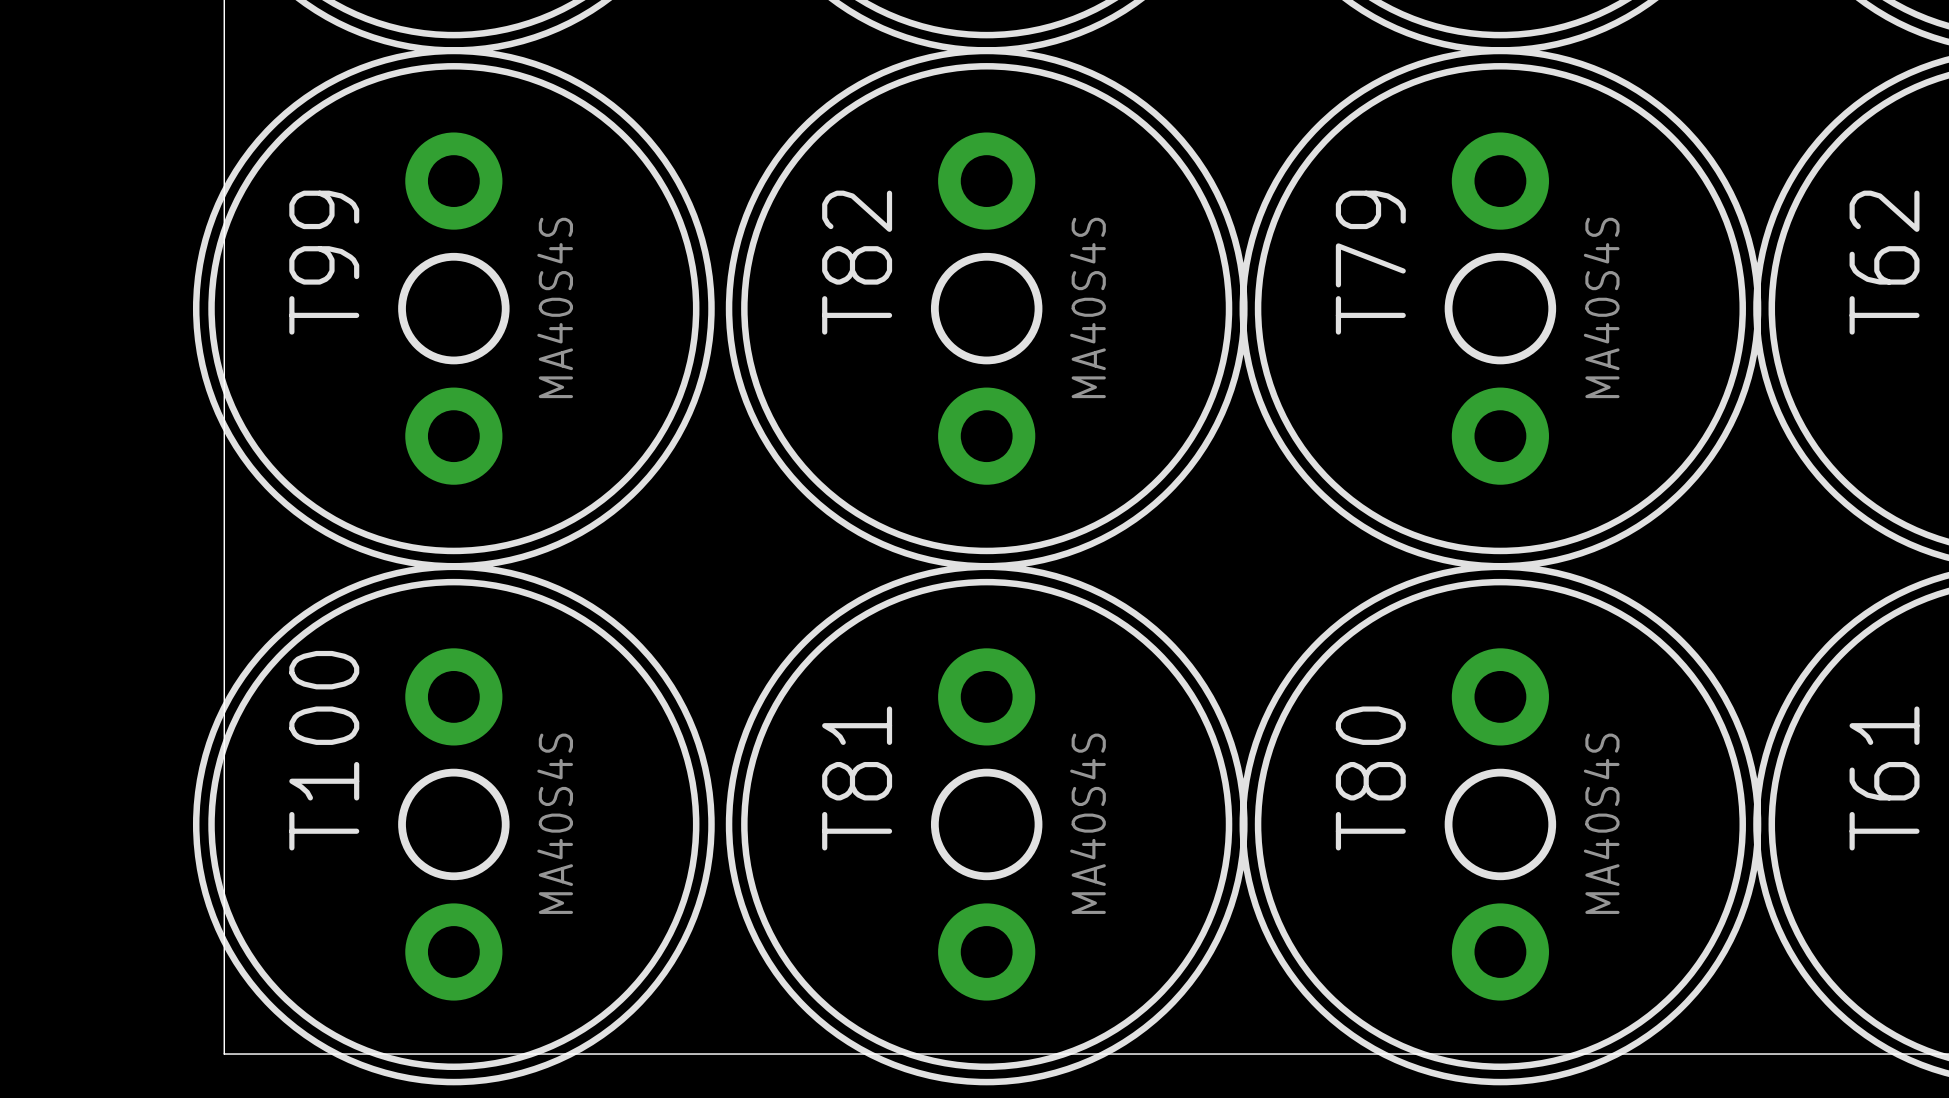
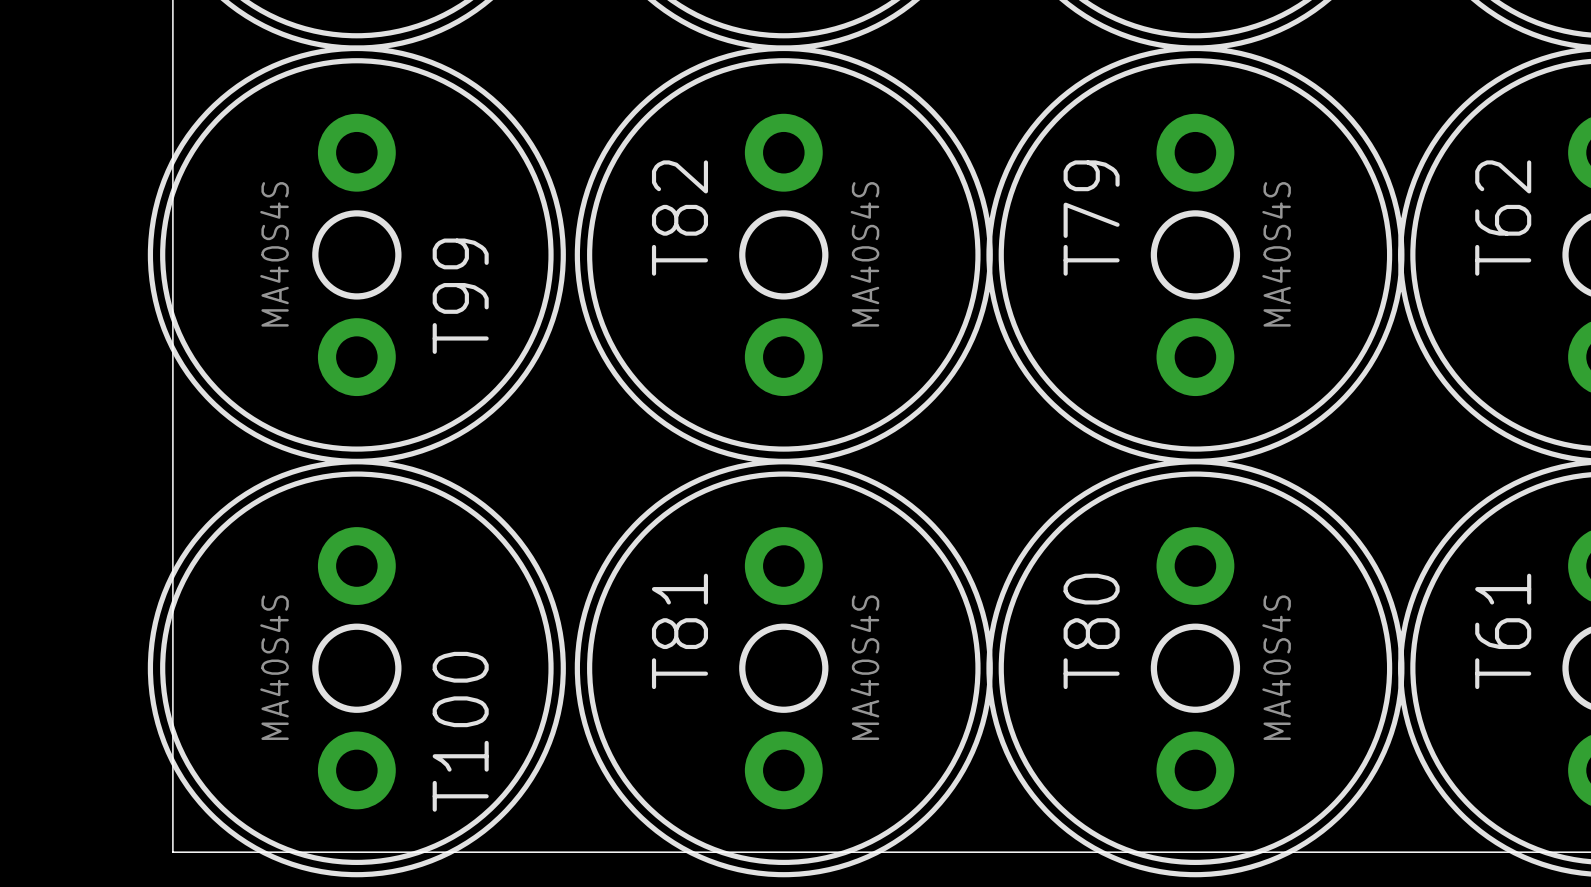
T99 name position: T99 (324, 262) -> T99 (460, 296)
T99 value position: MA40S4S (555, 307) -> MA40S4S (274, 254)
T100 name position: T100 (324, 750) -> T100 (460, 731)
T100 value position: MA40S4S (555, 823) -> MA40S4S (274, 667)

